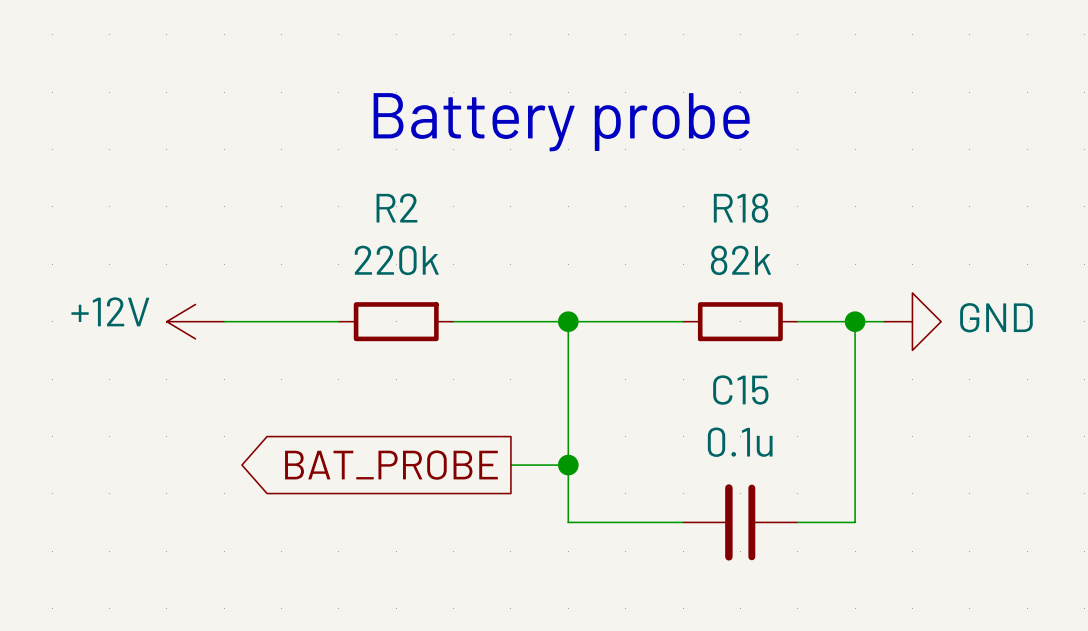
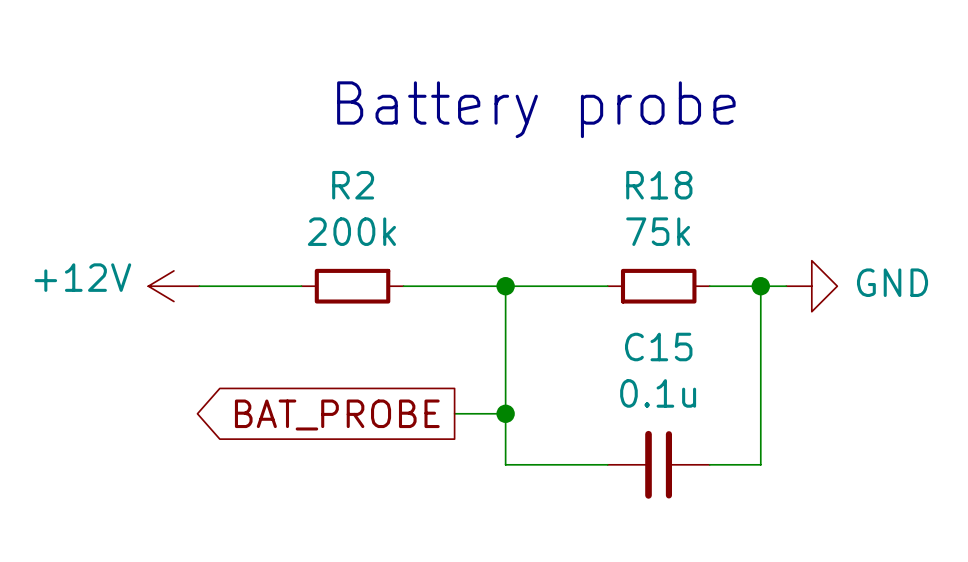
R2 value: 220k (396, 260) -> 200k (351, 231)
R18 value: 82k (740, 260) -> 75k (658, 231)

